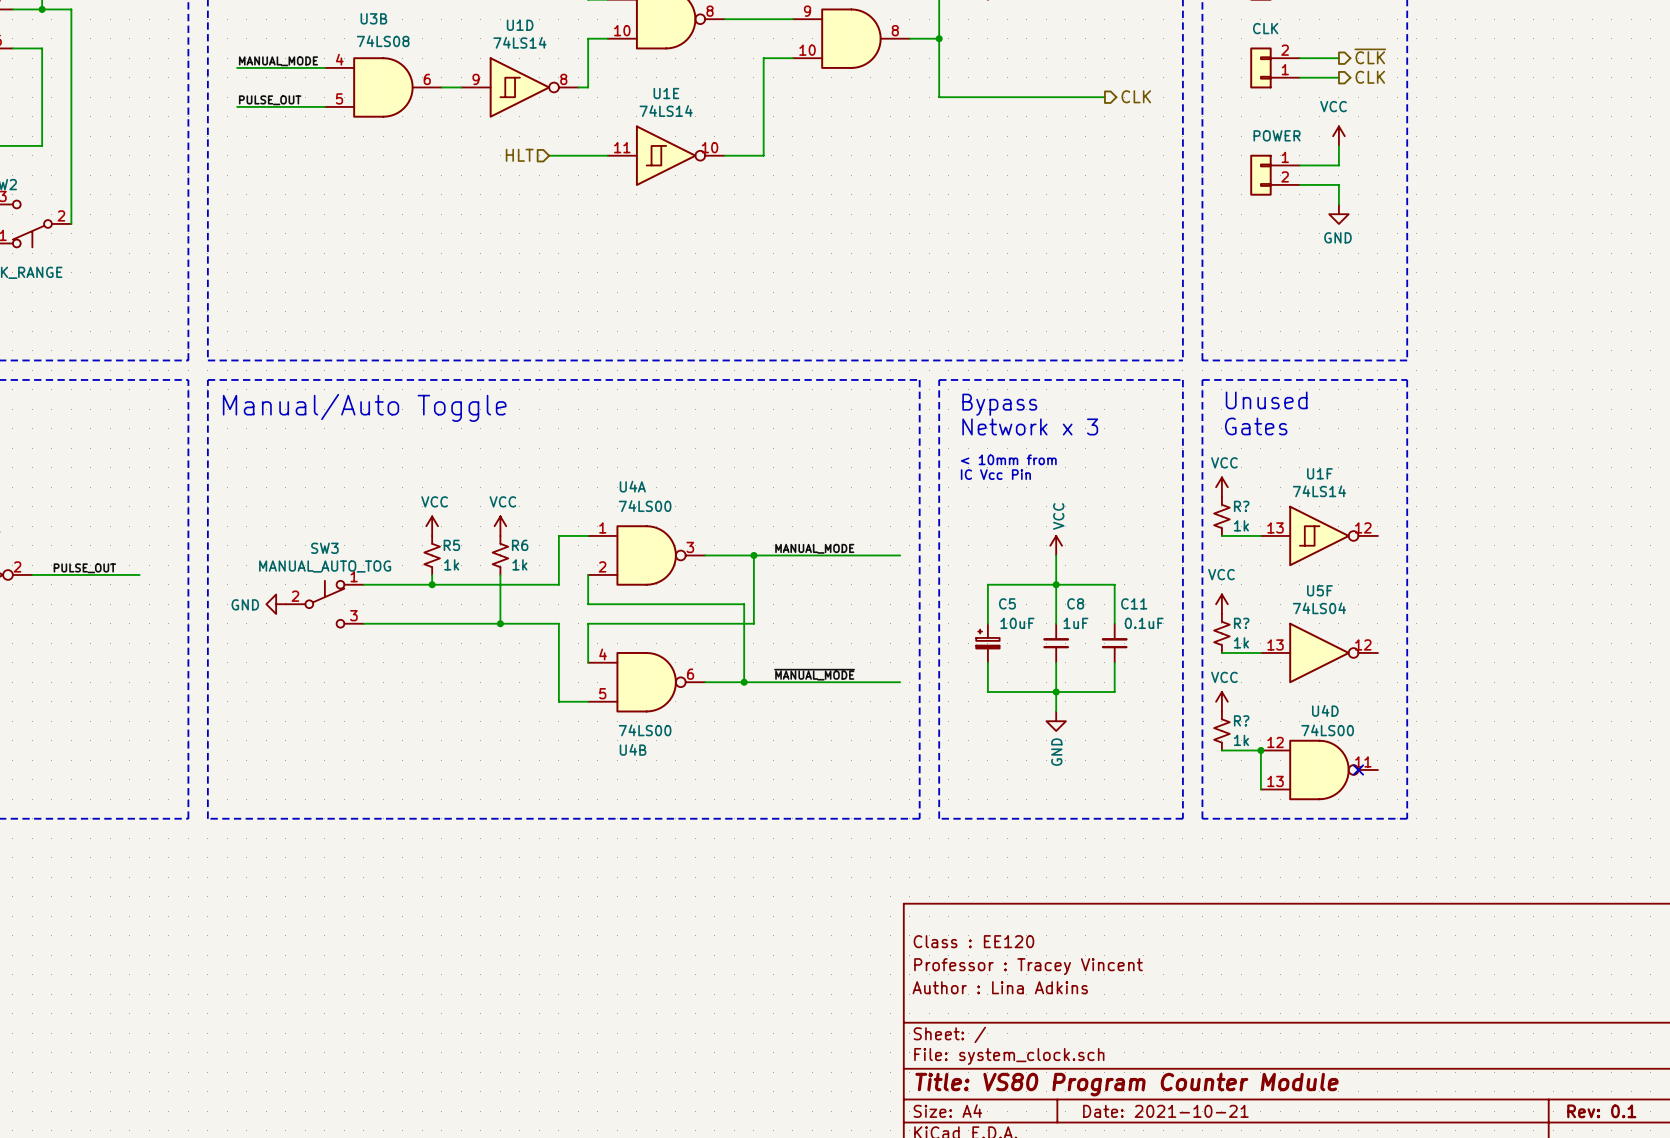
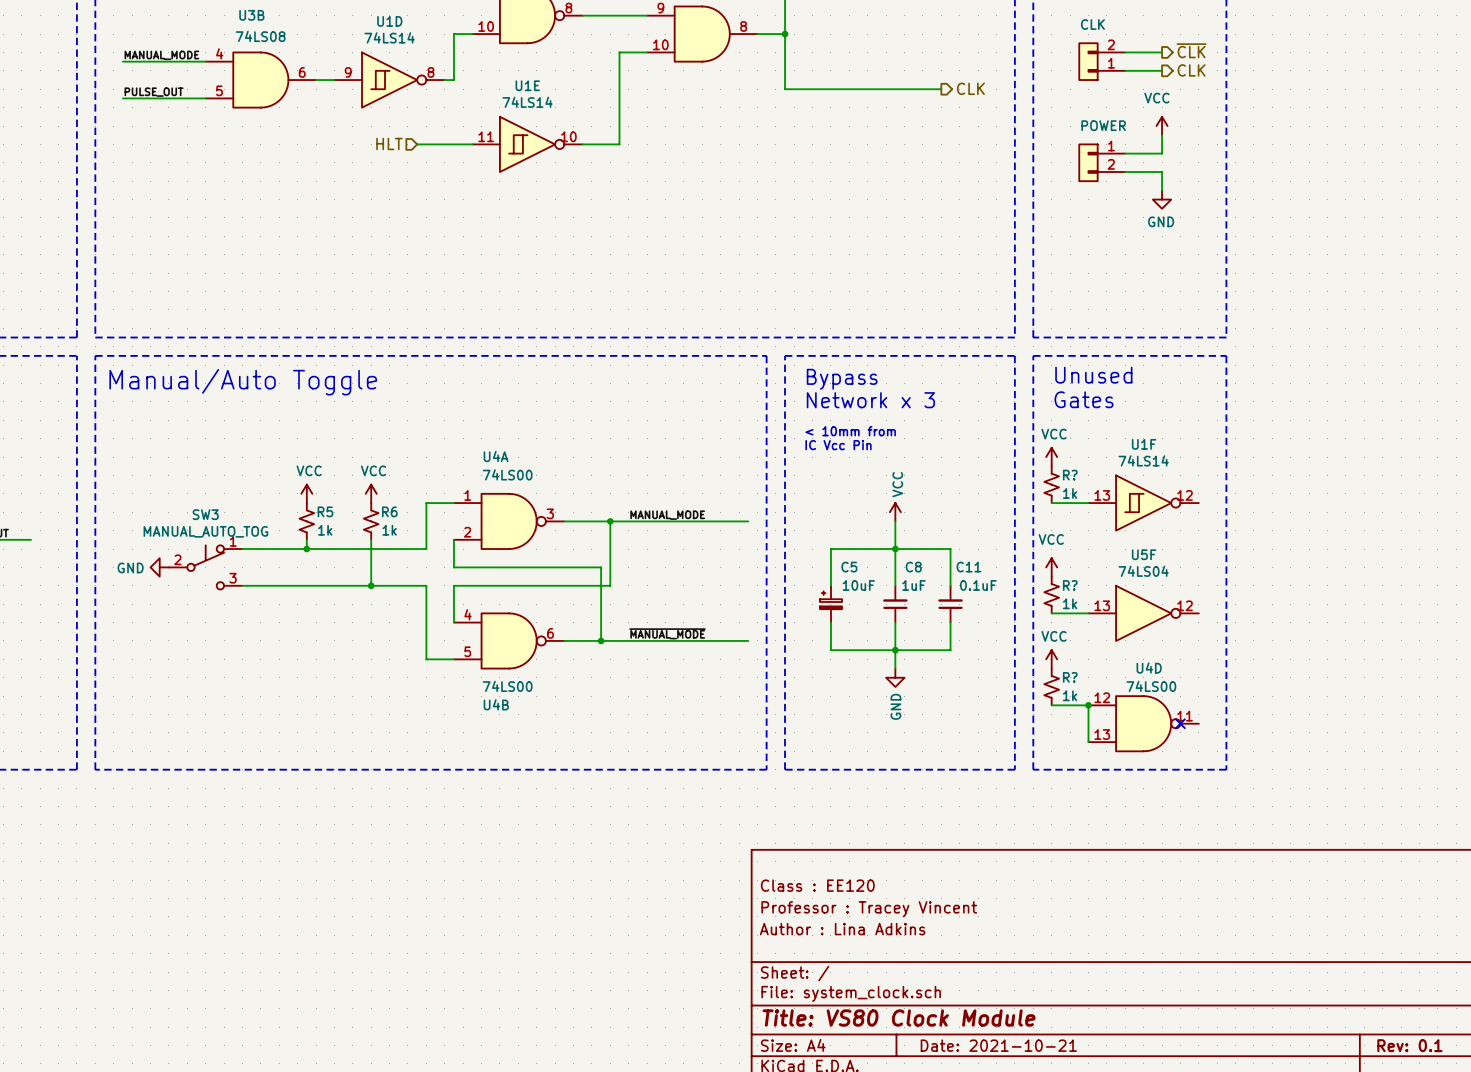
title block: Title: VS80 Program Counter Module (1127, 1084) -> Title: VS80 Clock Module (899, 1018)

